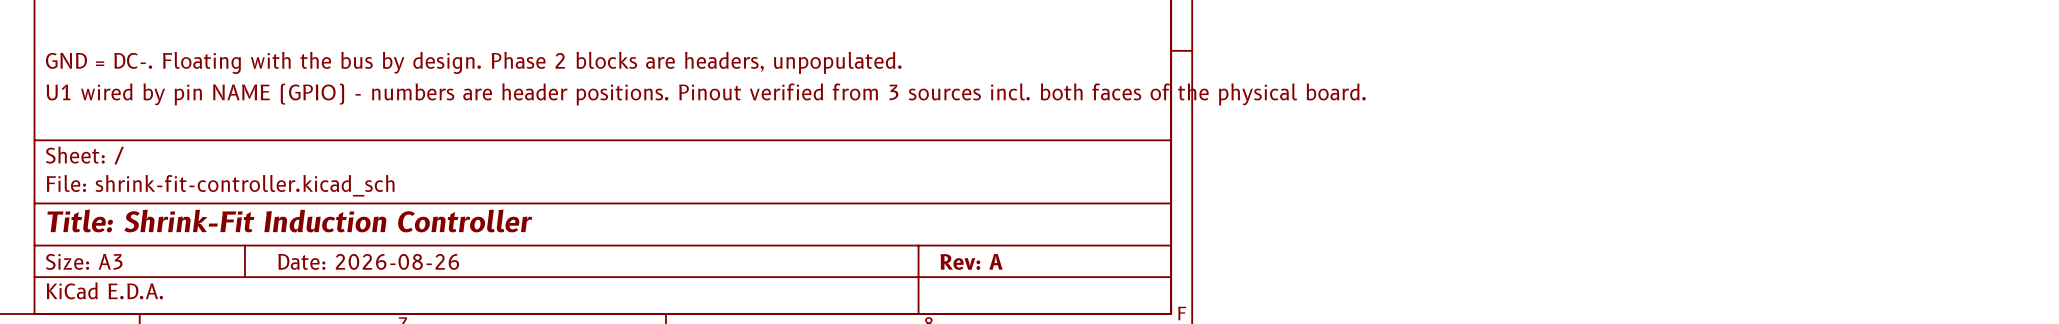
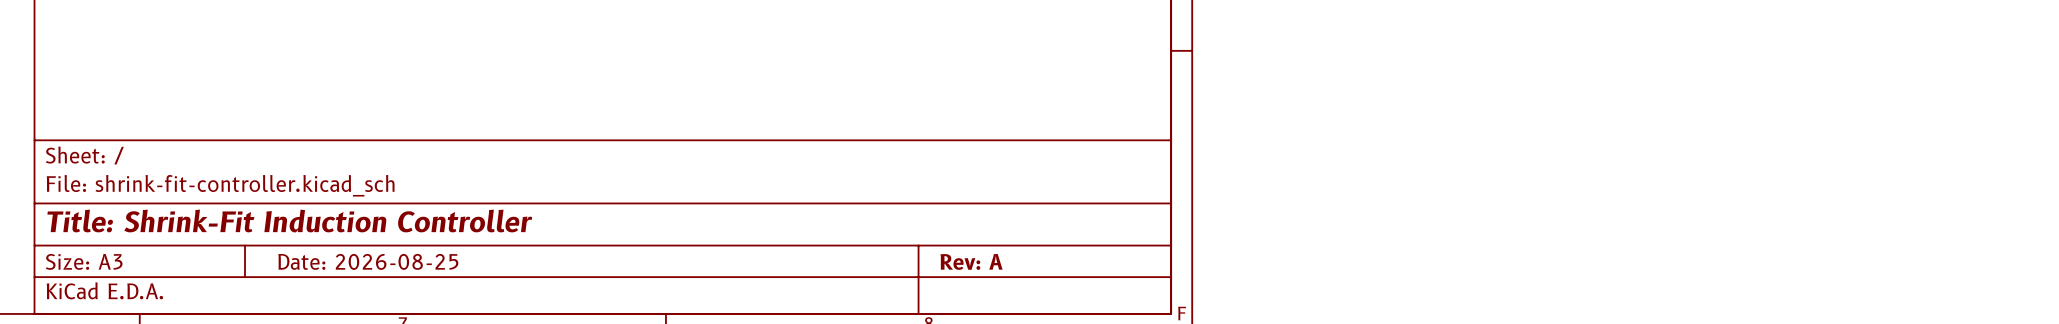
title block: GND = DC-. Floating with the bus by design. Phase 2 blocks are headers, unpopulated. (473, 62) -> none
title block: U1 wired by pin NAME (GPIO) - numbers are header positions. Pinout verified from 3 sources incl. both faces of the physical board. (706, 94) -> none
title block: Date: 2026-08-26 (368, 261) -> Date: 2026-08-25 (368, 261)

